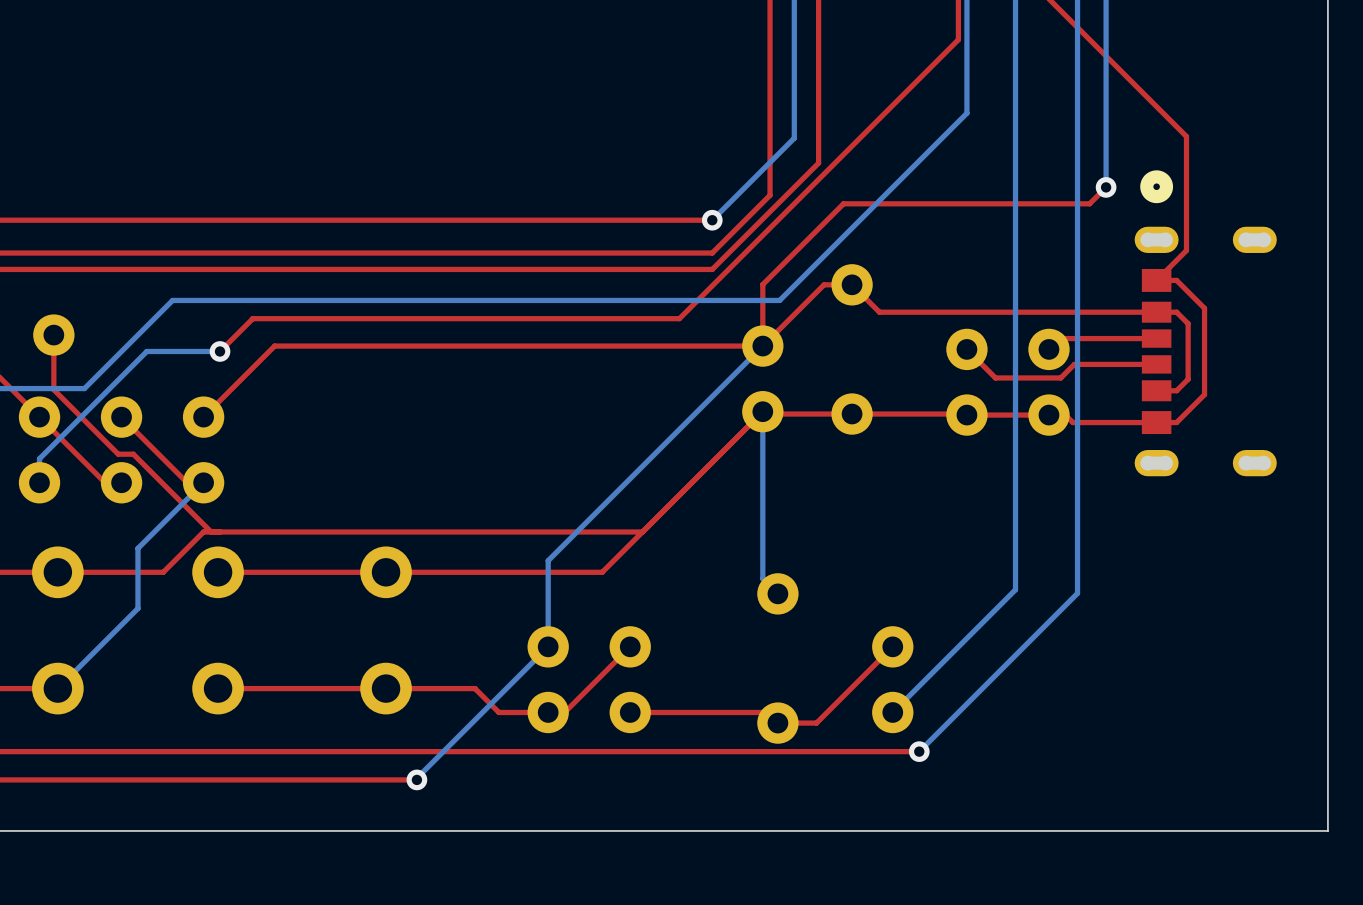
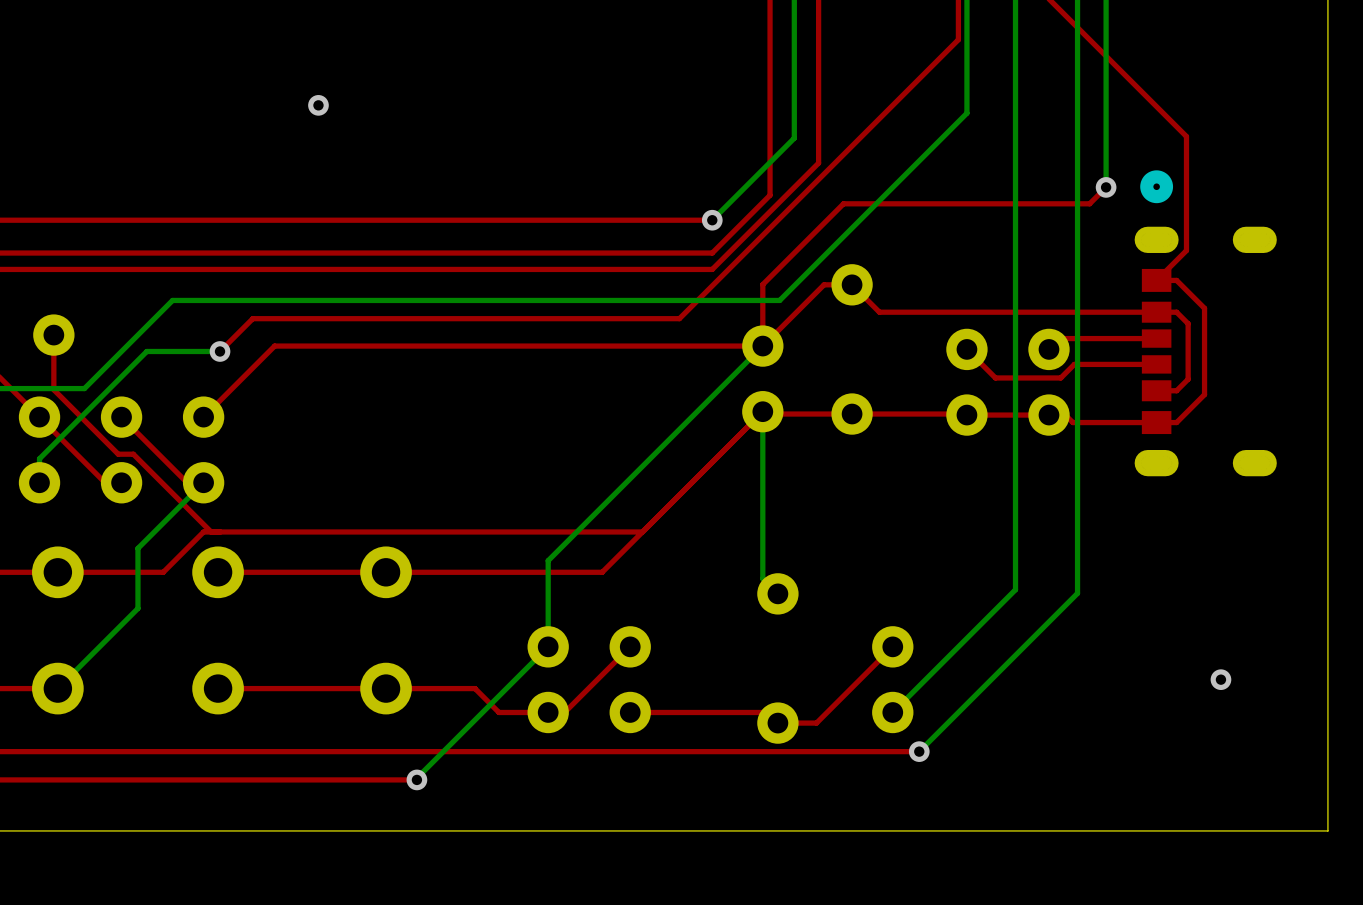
via: none -> (318, 105)
via: none -> (1220, 679)

